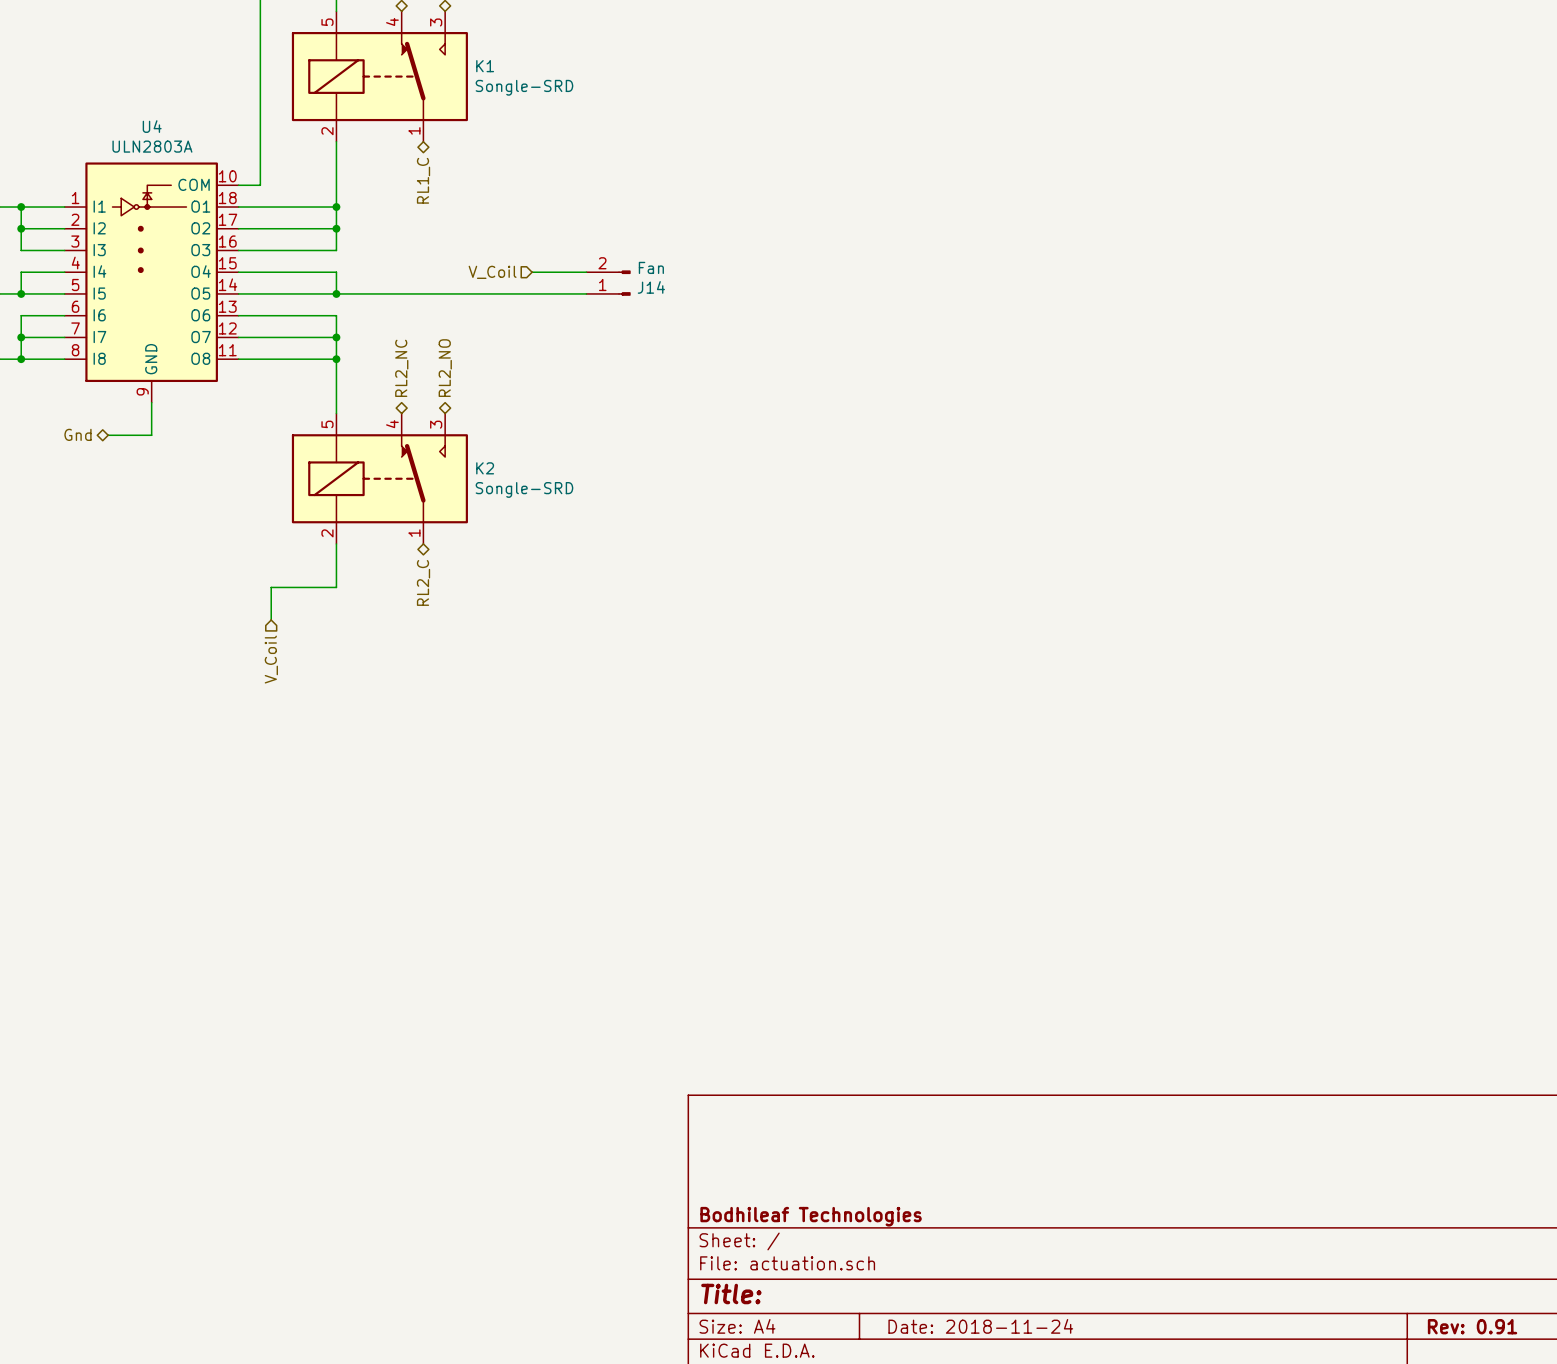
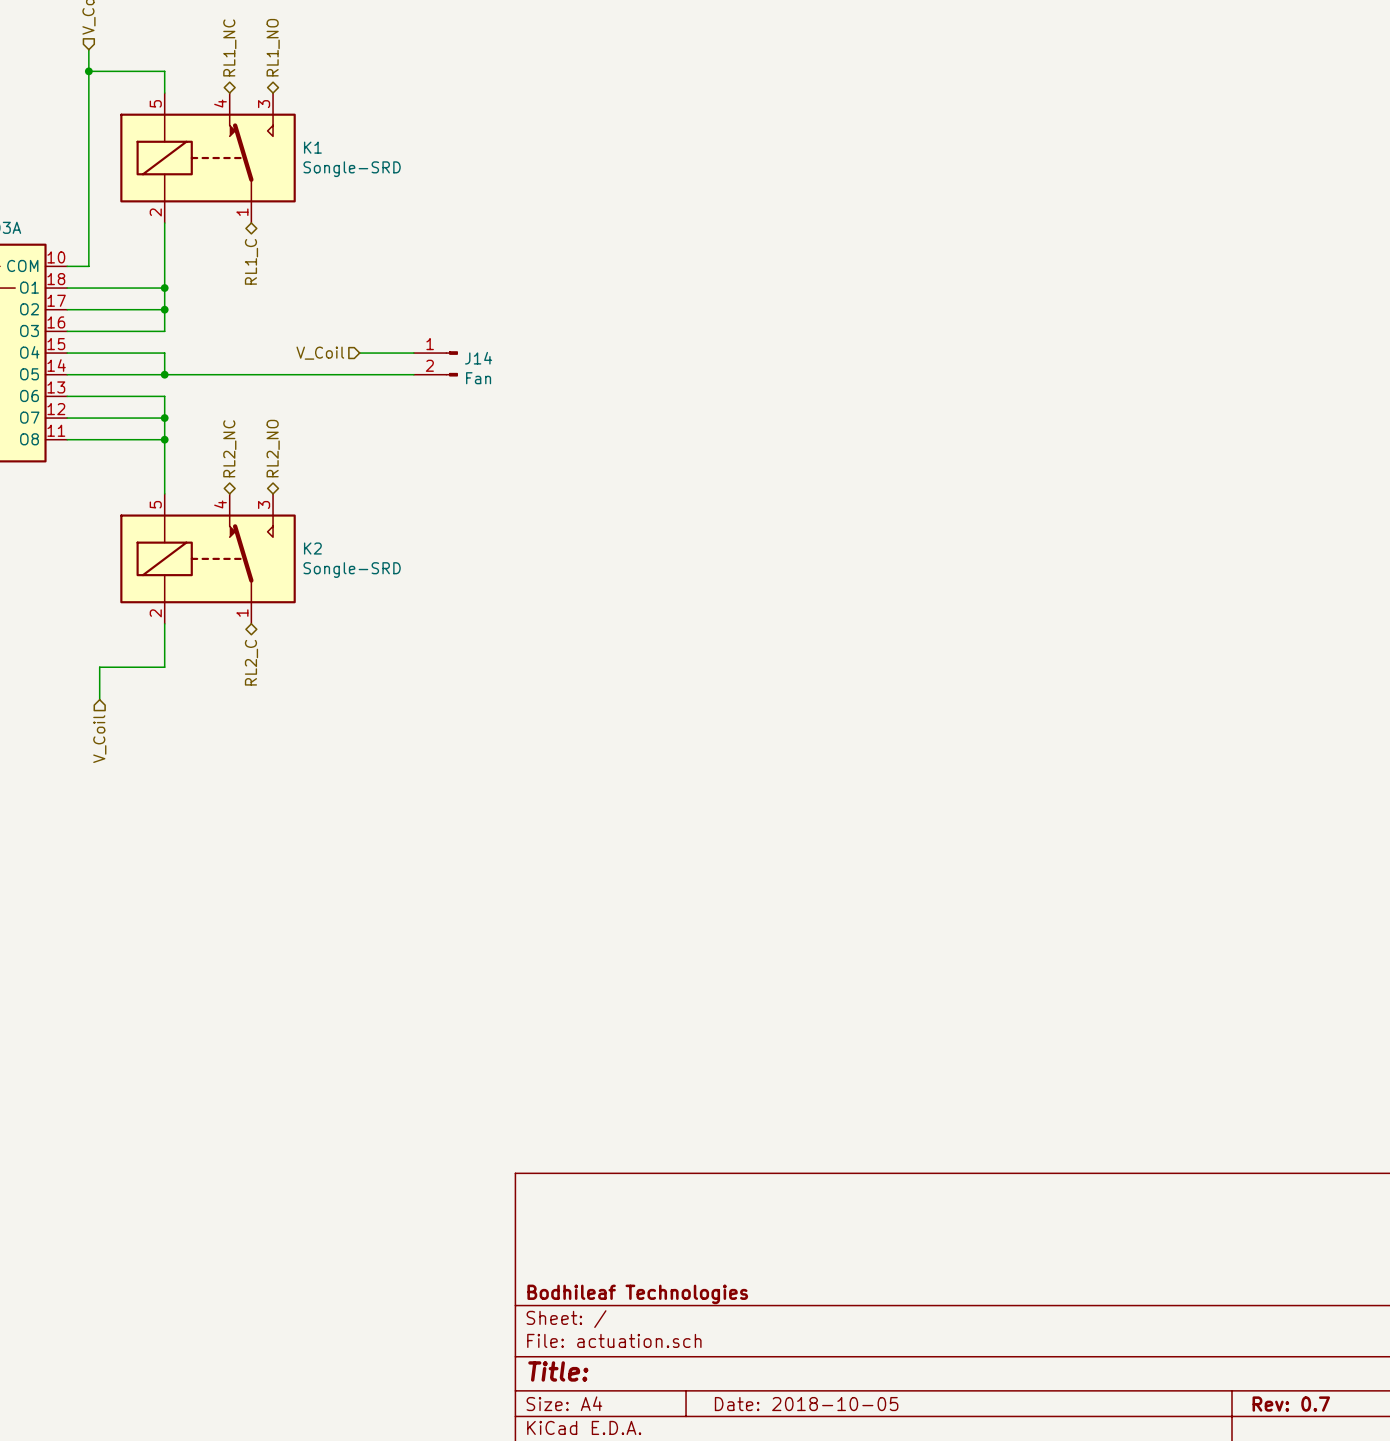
J14 flip: as is (624, 283) -> up-down (451, 363)
title block: Date: 2018-11-24 (980, 1326) -> Date: 2018-10-05 (806, 1404)
title block: Rev: 0.91 (1472, 1326) -> Rev: 0.7 (1291, 1404)

